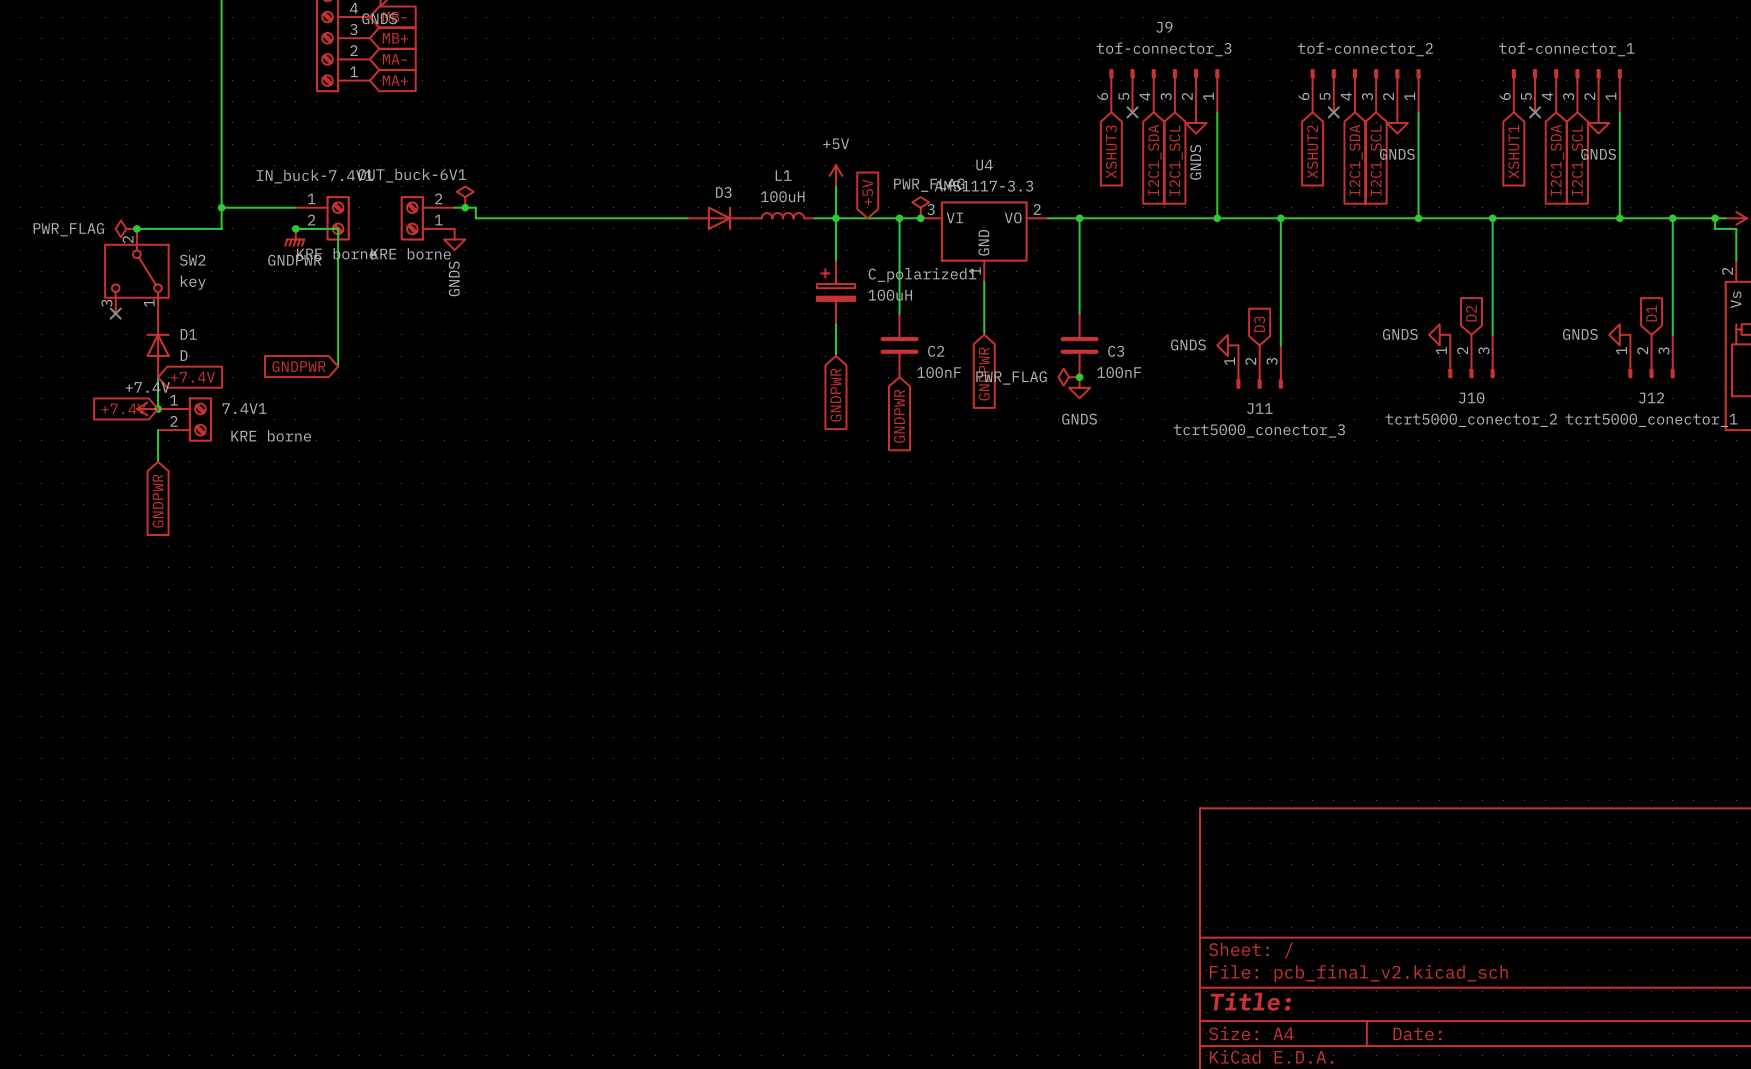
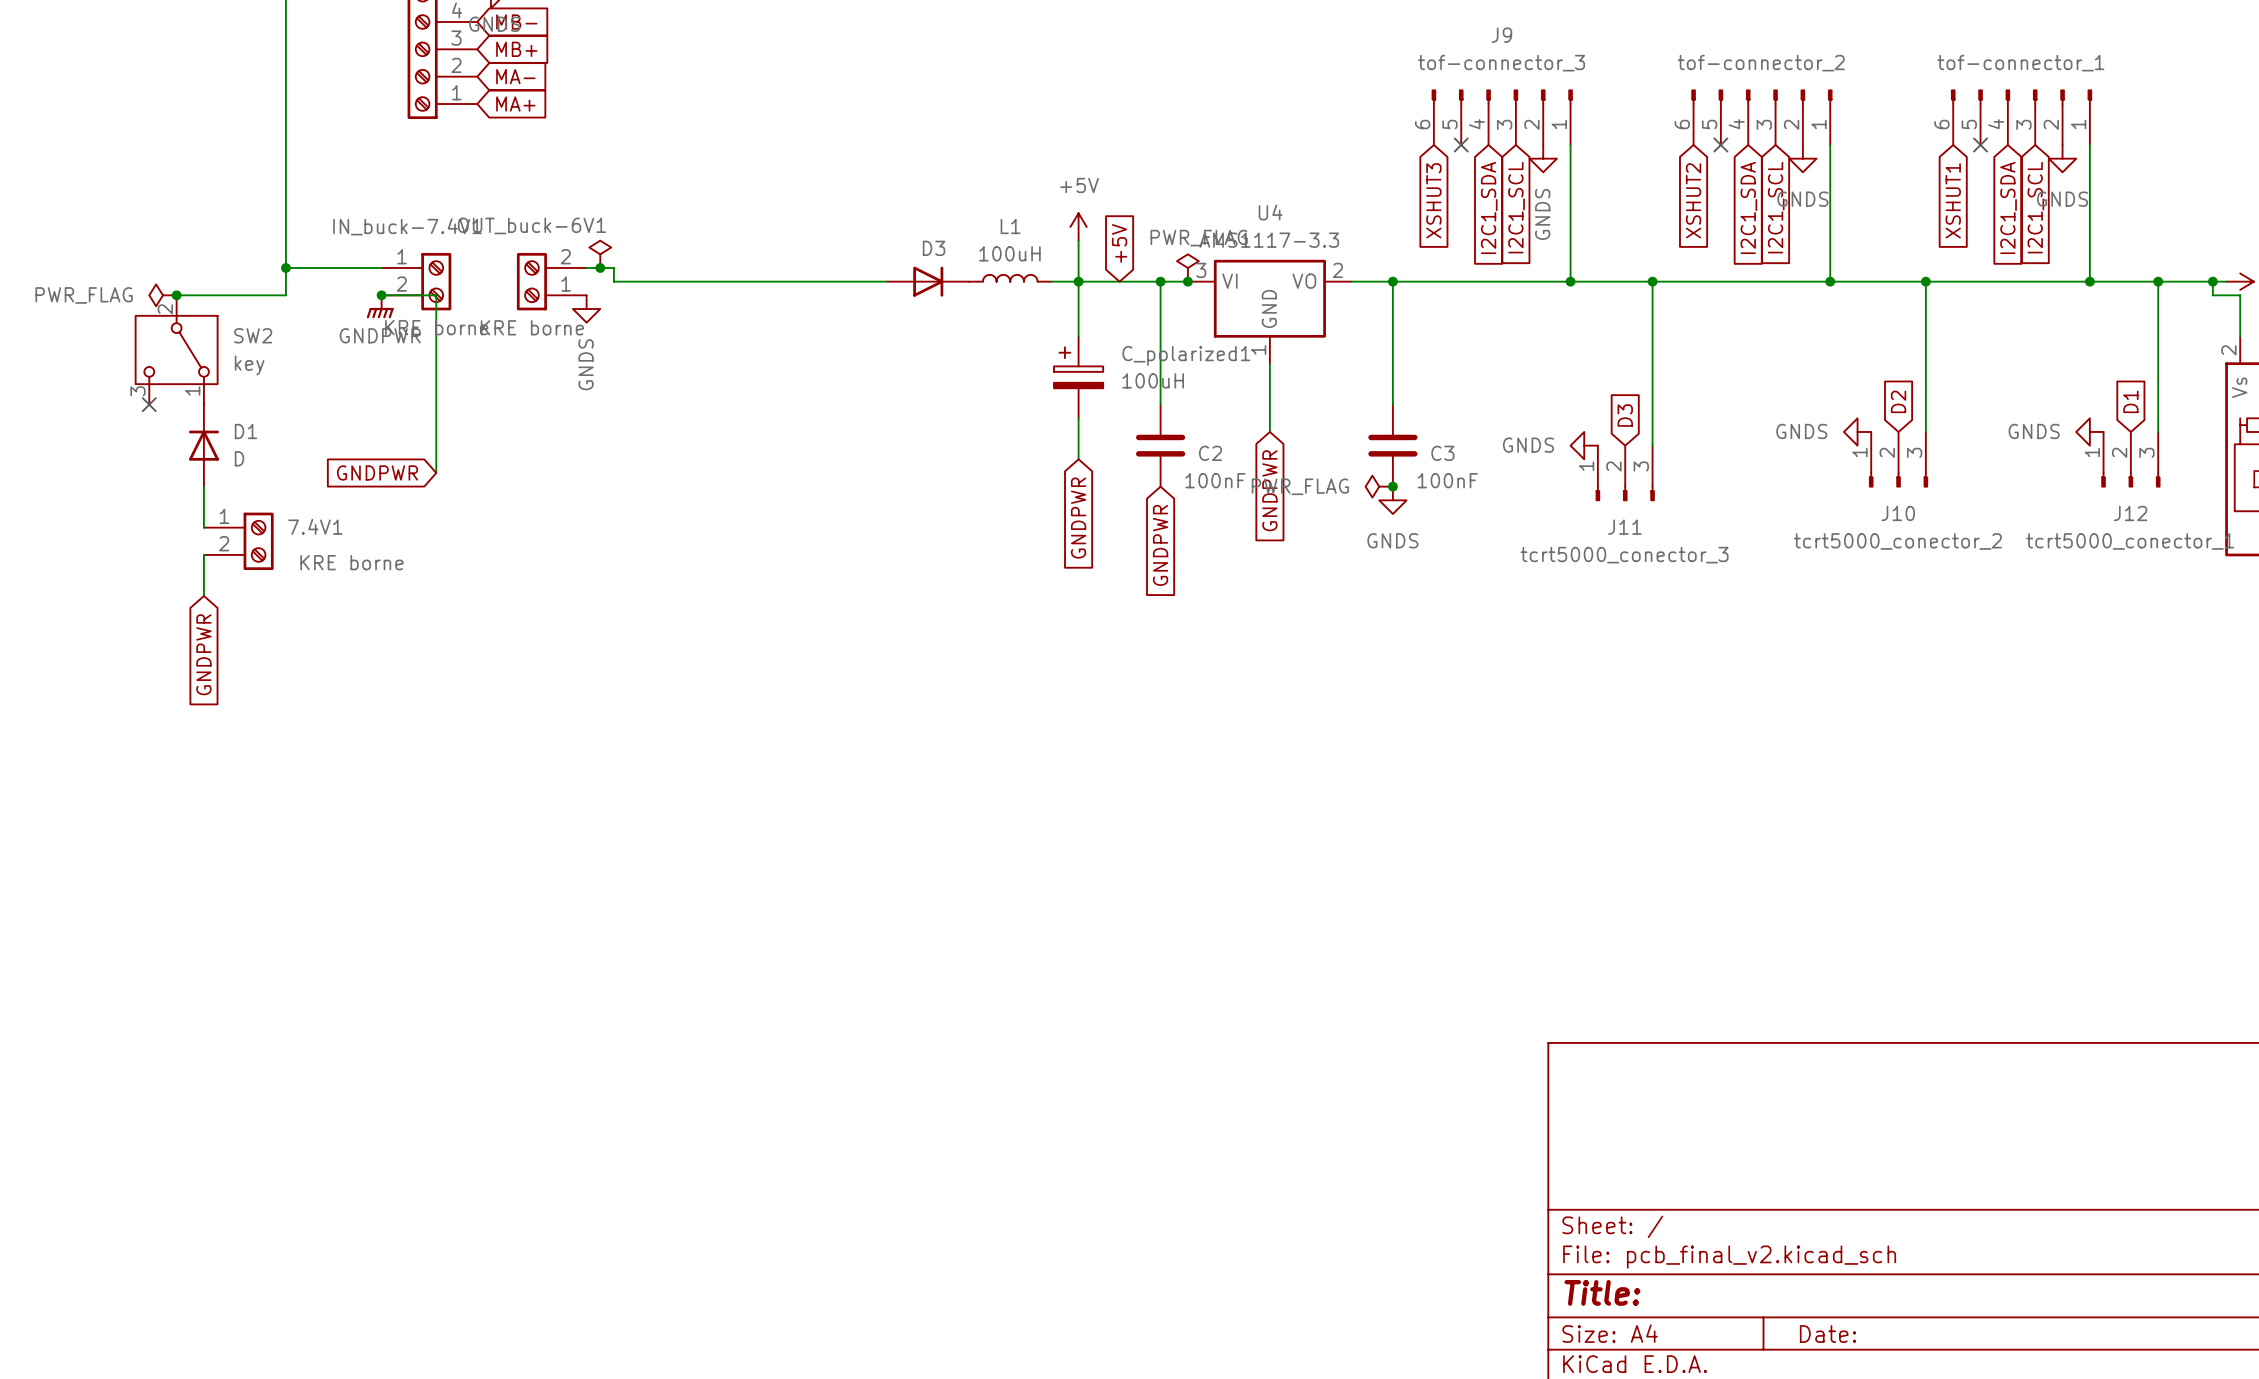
global label: +7.4V (192, 377) -> none
power symbol: +7.4V (147, 408) -> none
junction: (158, 408) -> none
global label: +7.4V (123, 409) -> none

